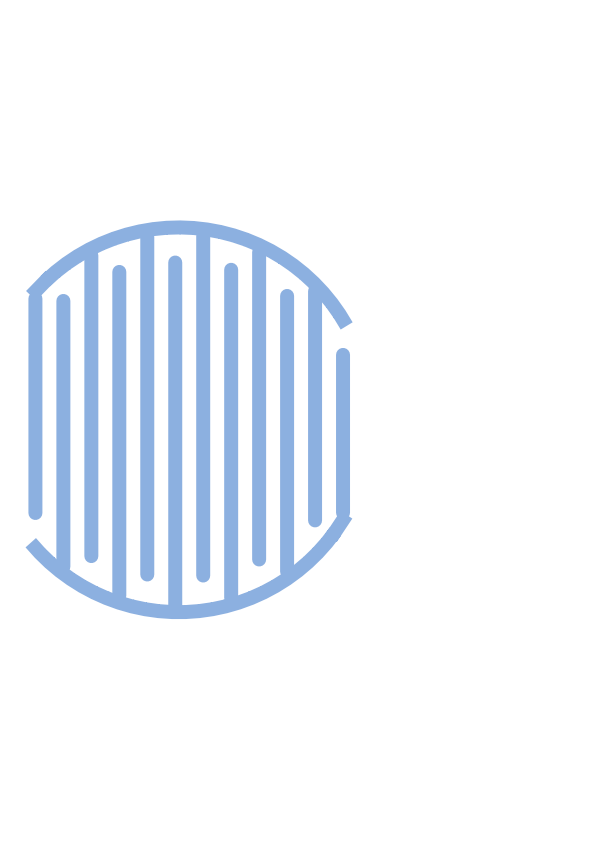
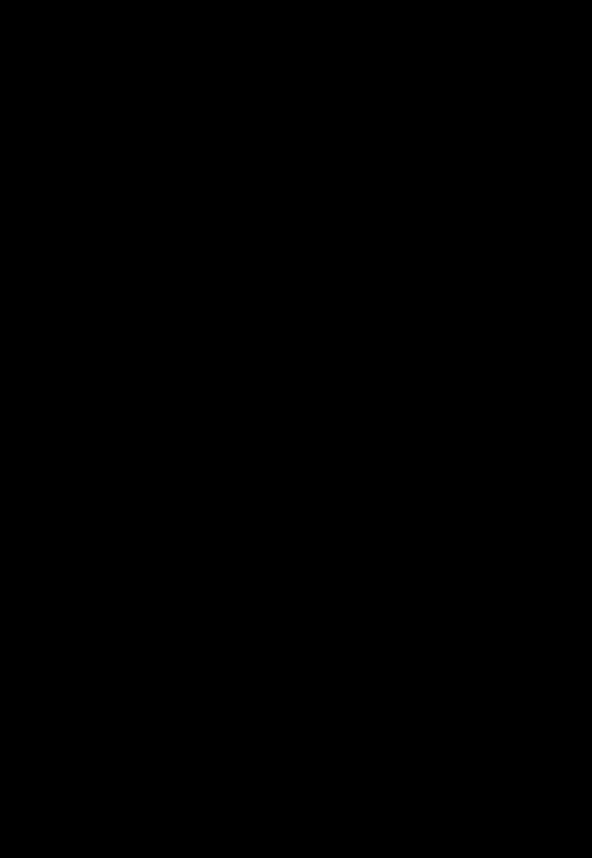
part: (189, 419) -> none

